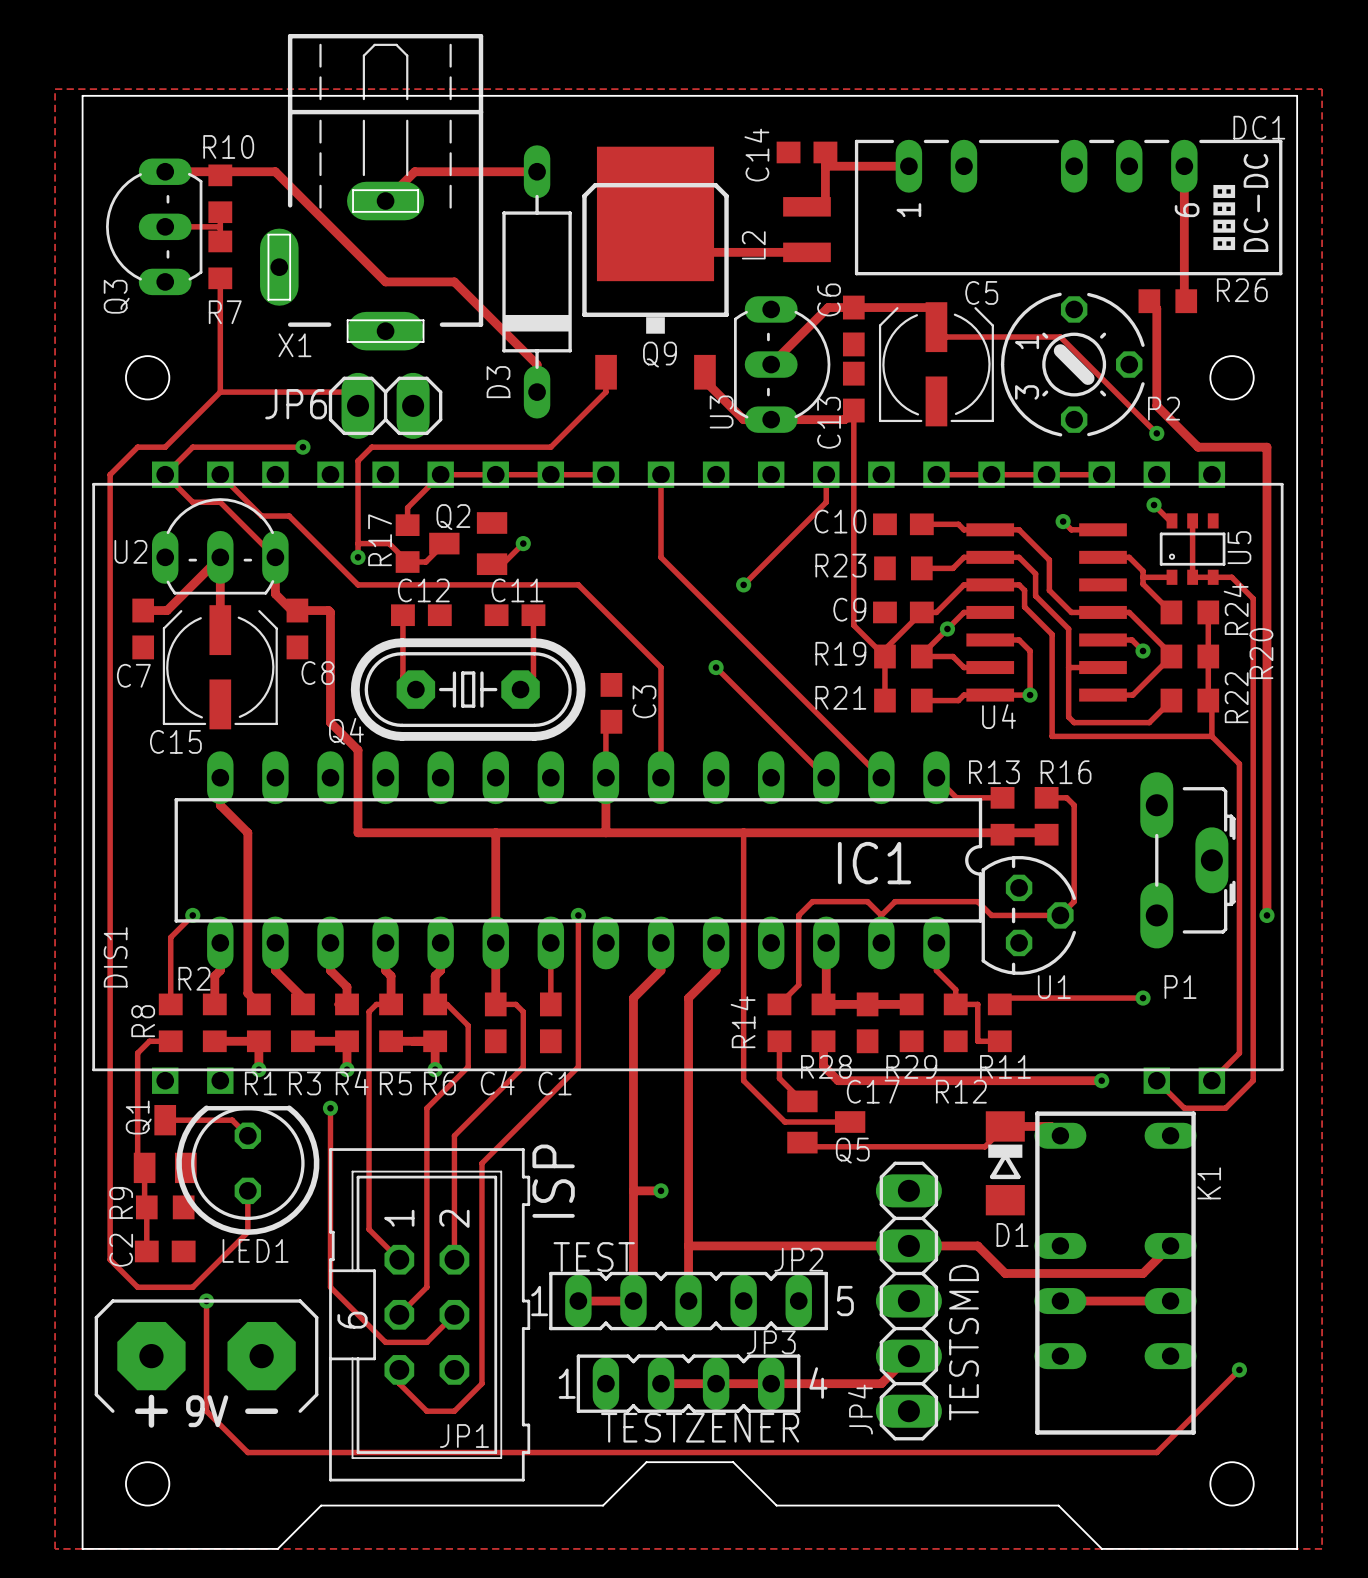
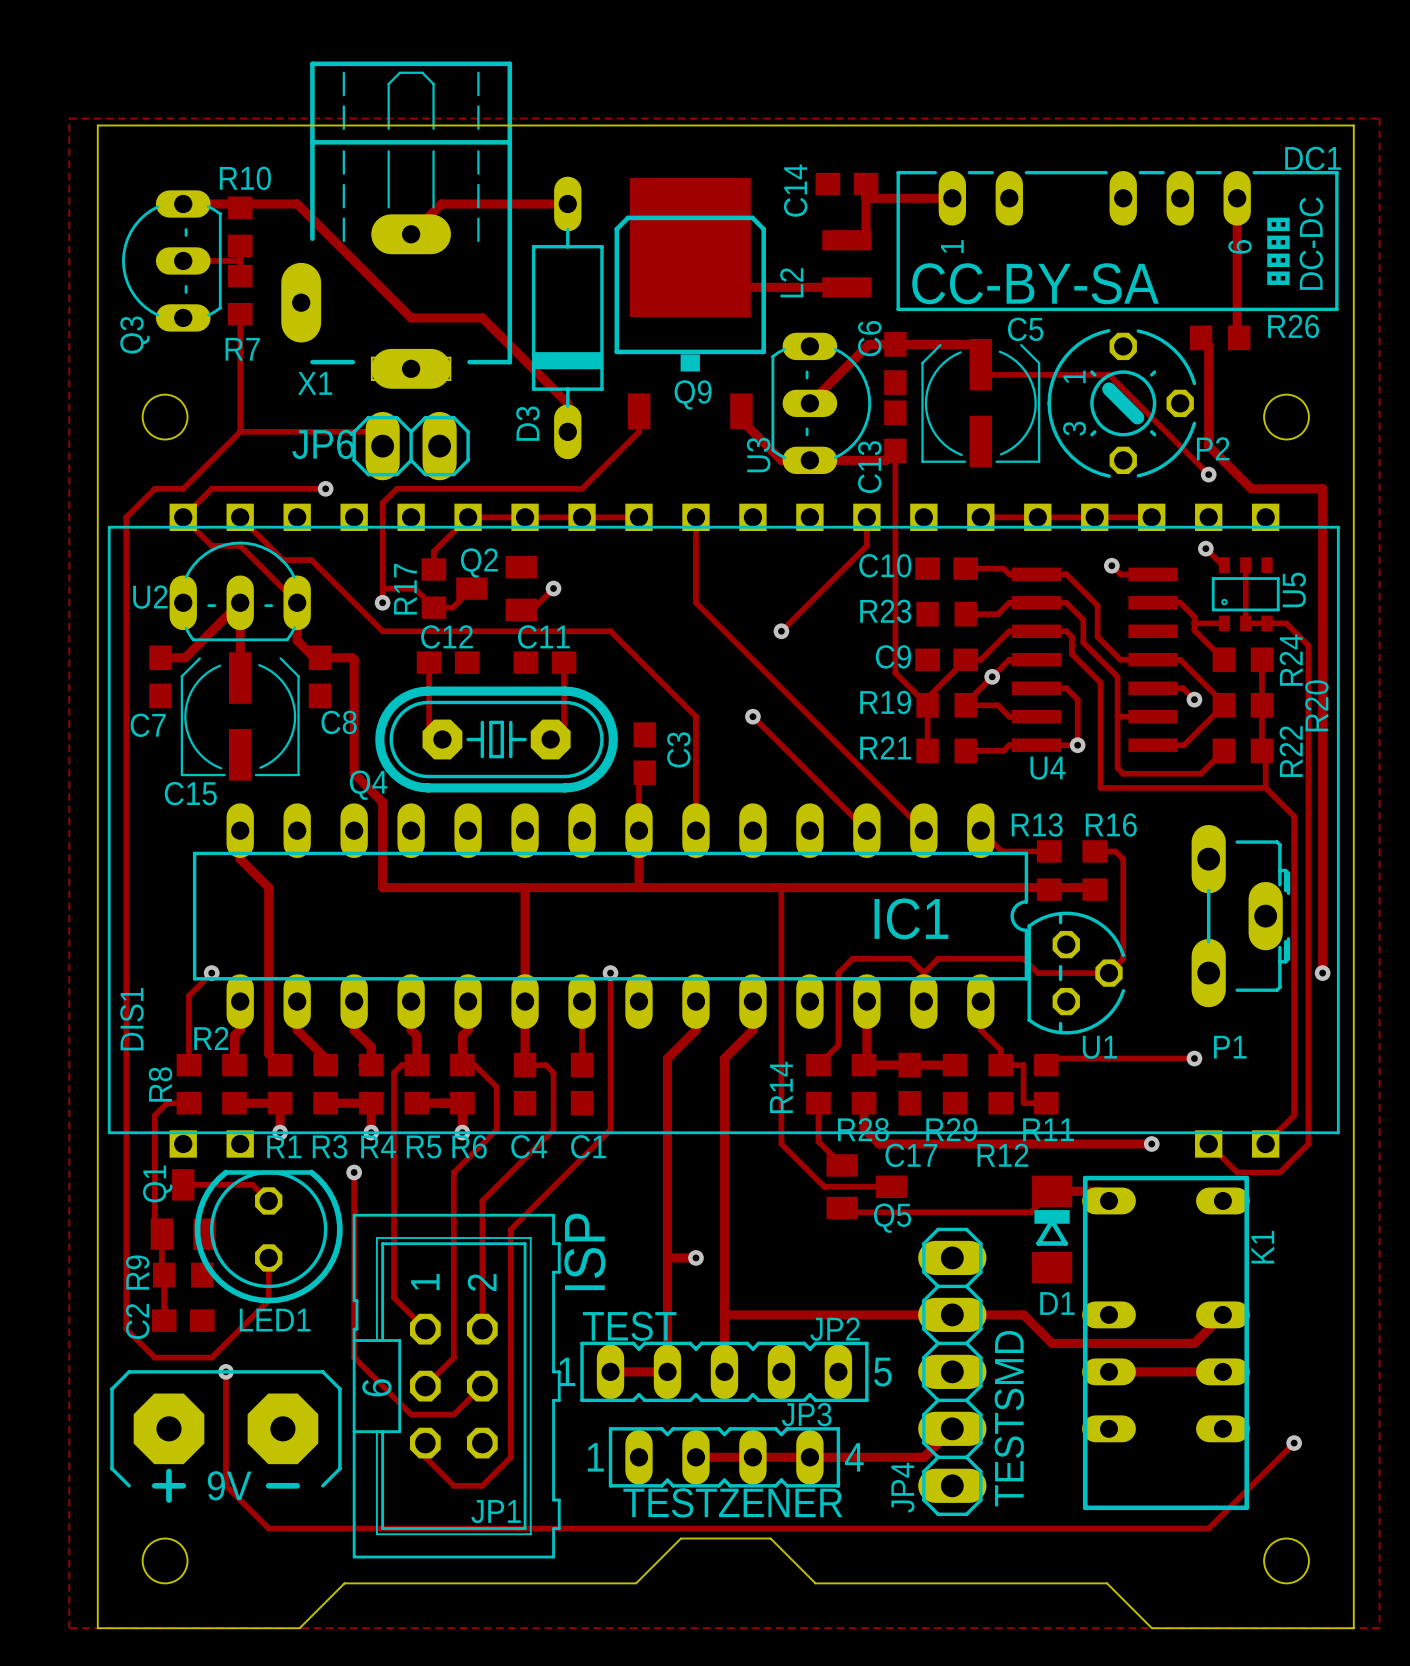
text: none -> CC-BY-SA (1035, 283)

